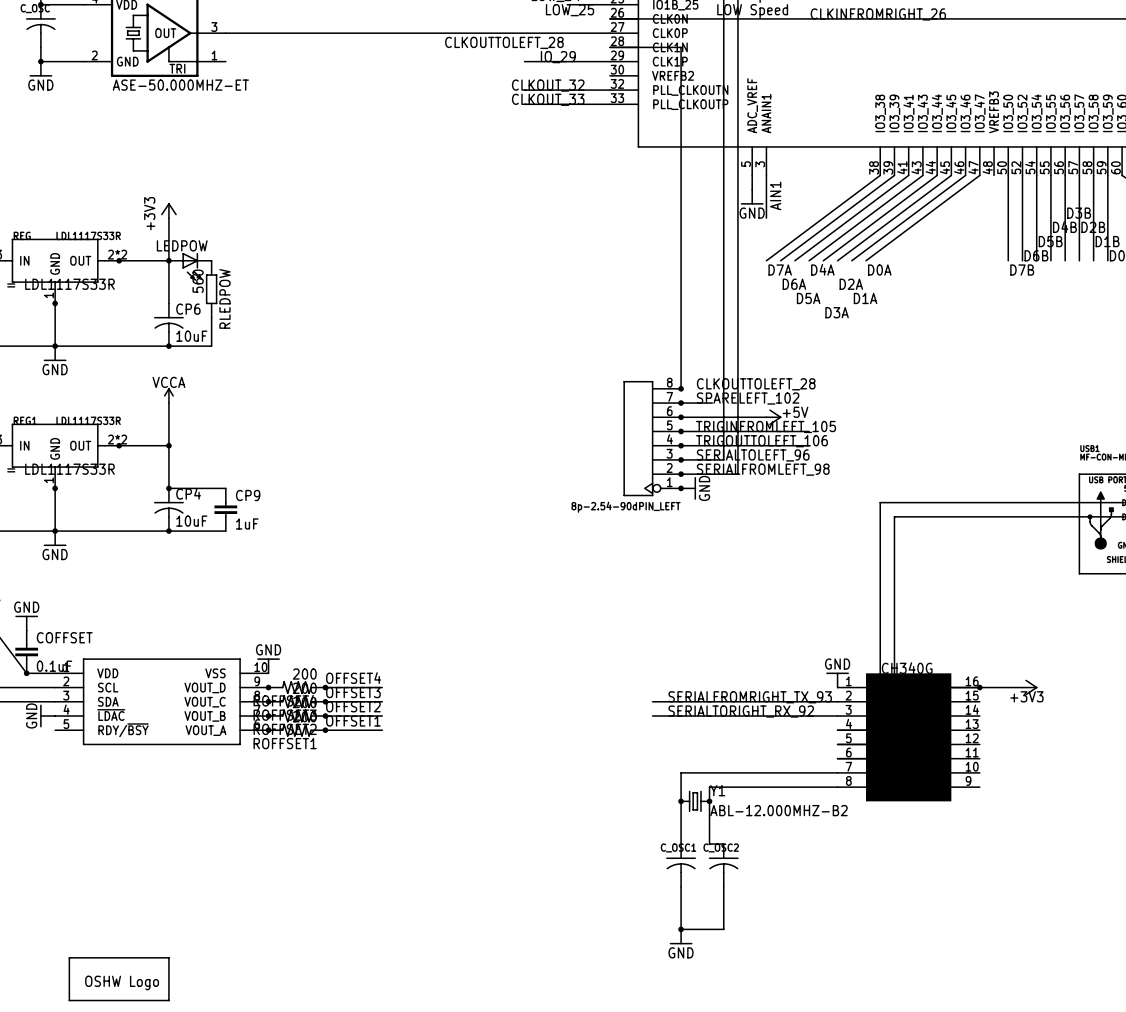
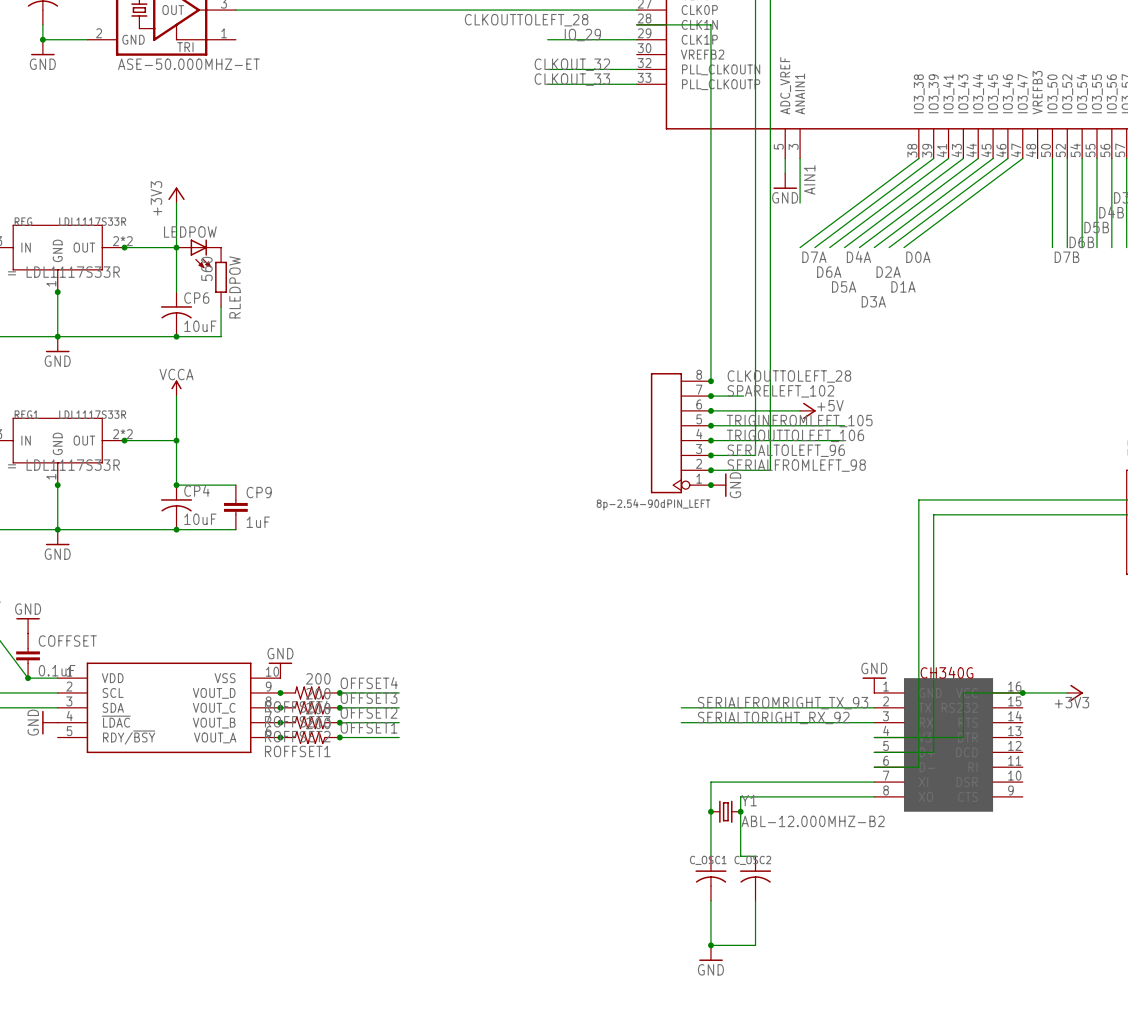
part: (119, 979) -> none

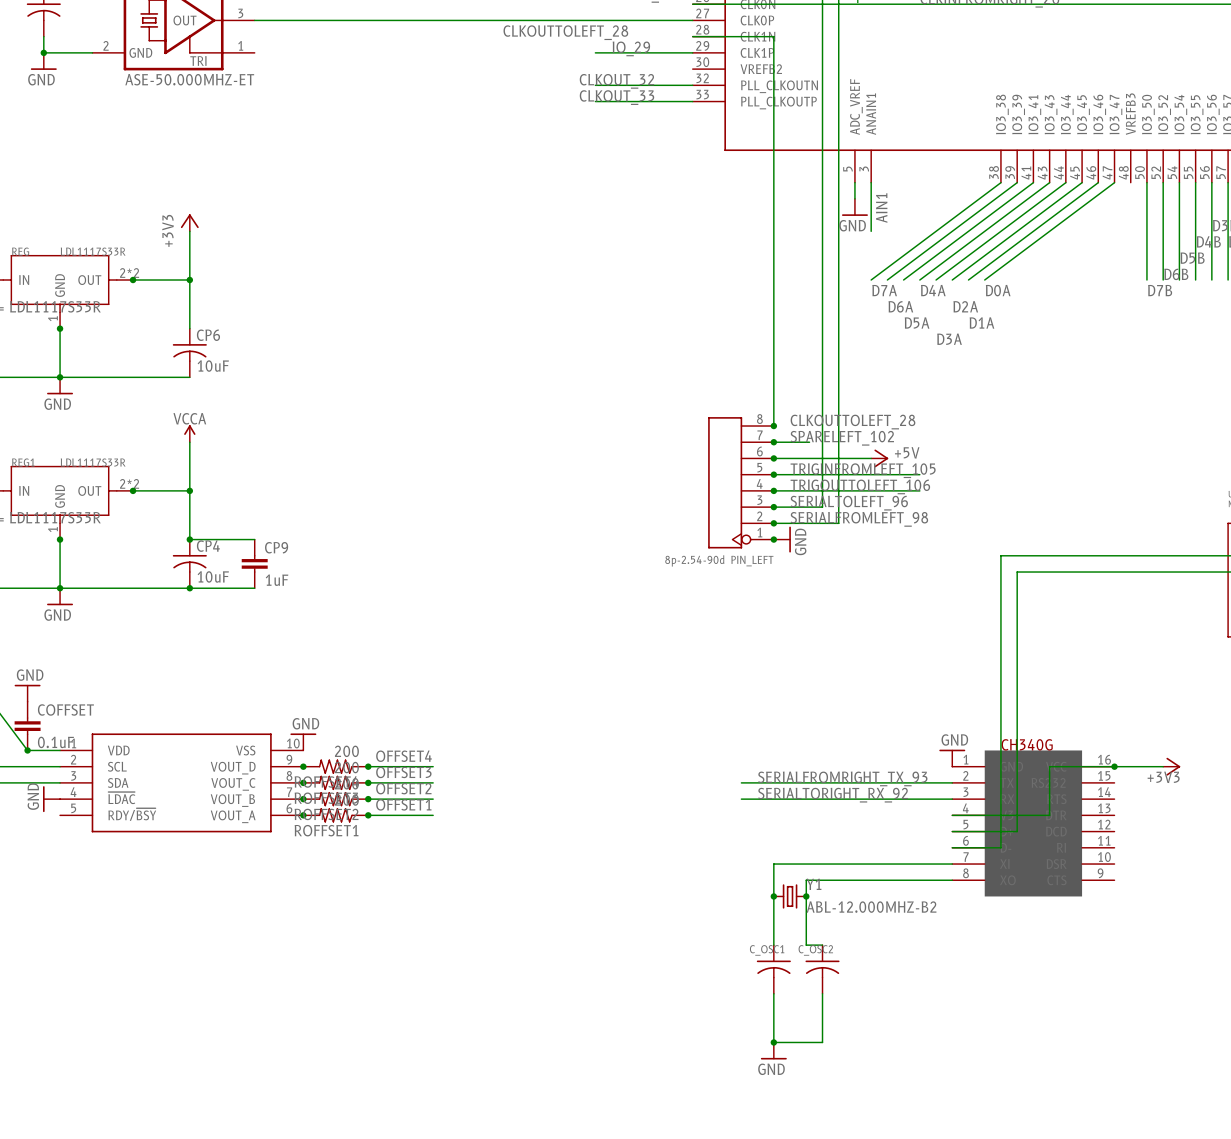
LEDPOW: (198, 253) -> none
RLEDPOW: 560 (221, 277) -> none
wire: (221, 306) (221, 336) (176, 336) -> none
junction: (176, 336) -> none

